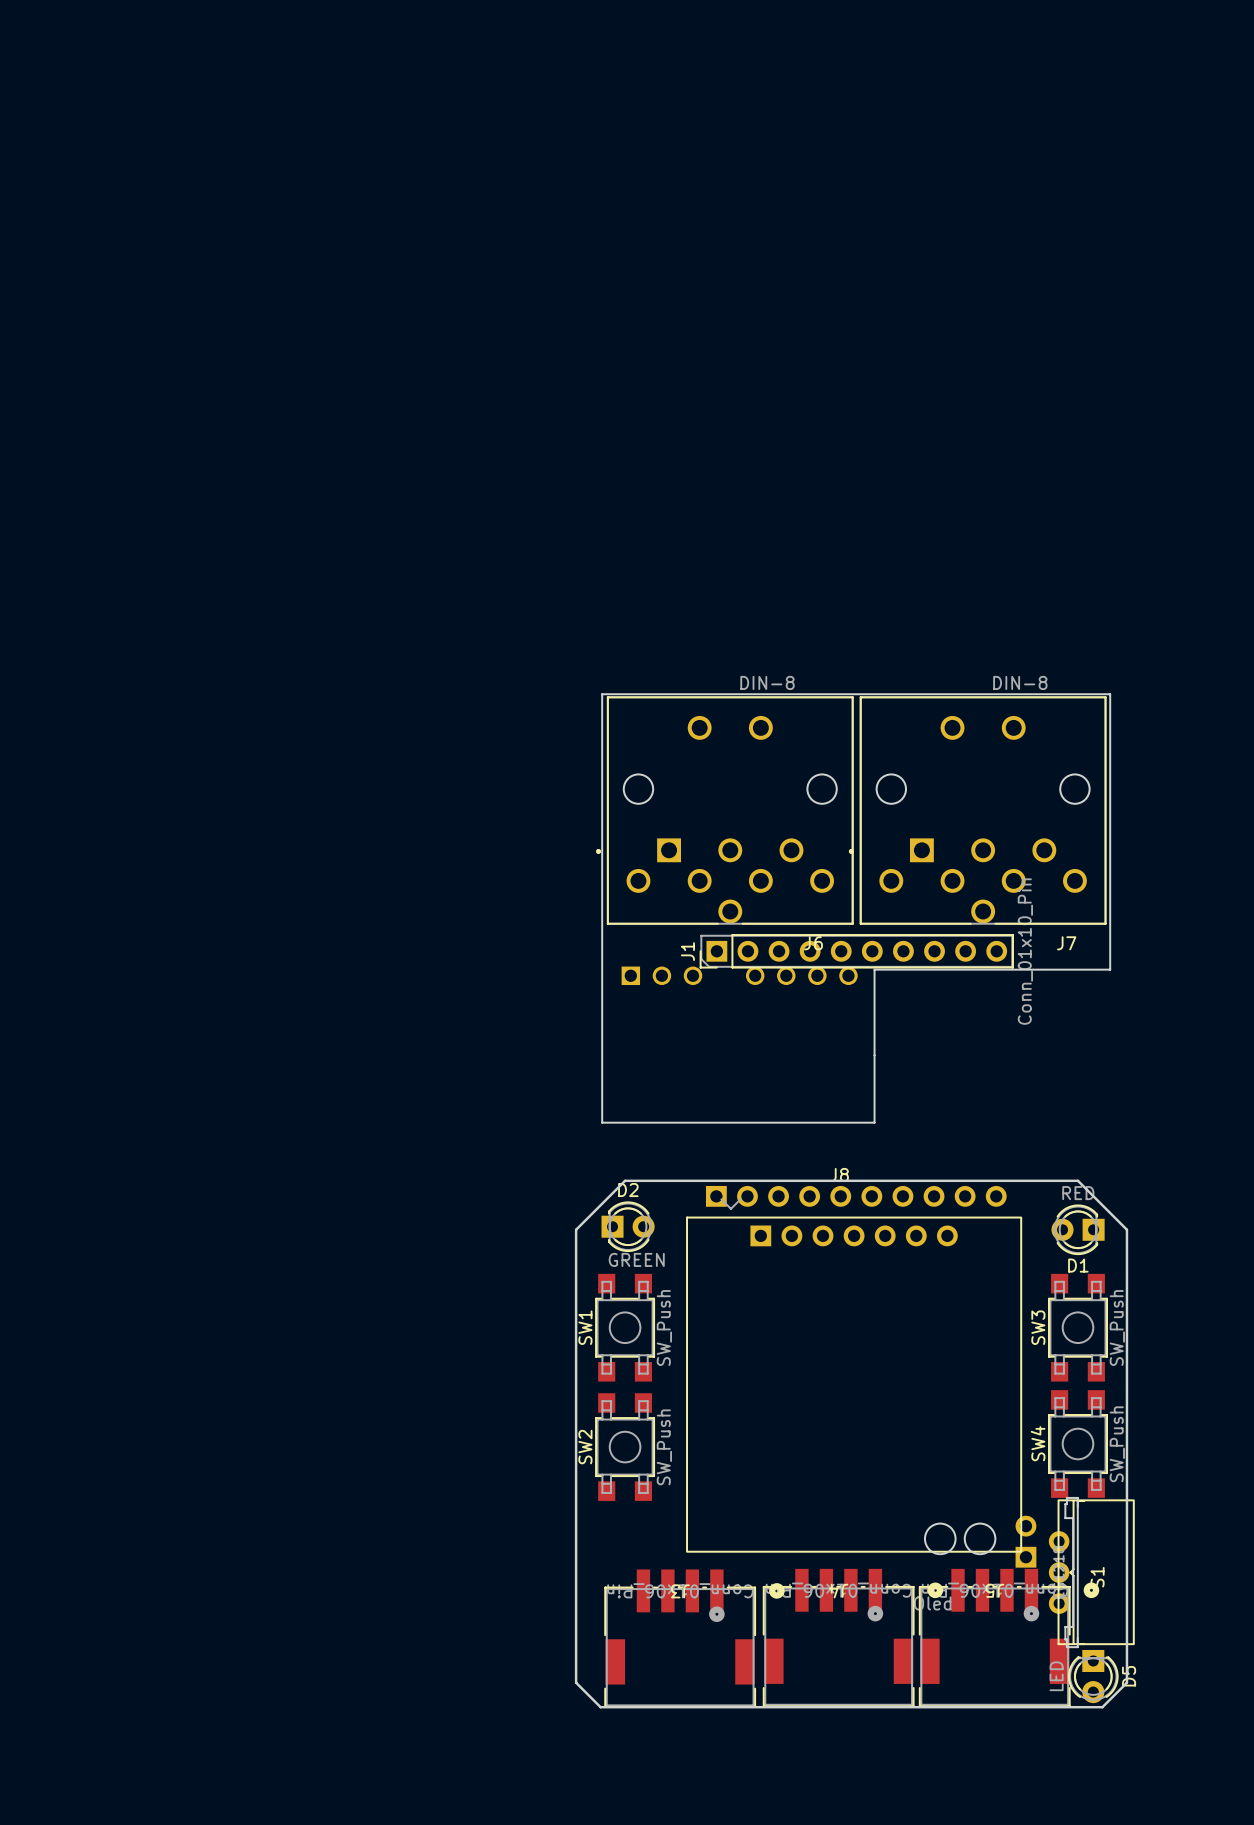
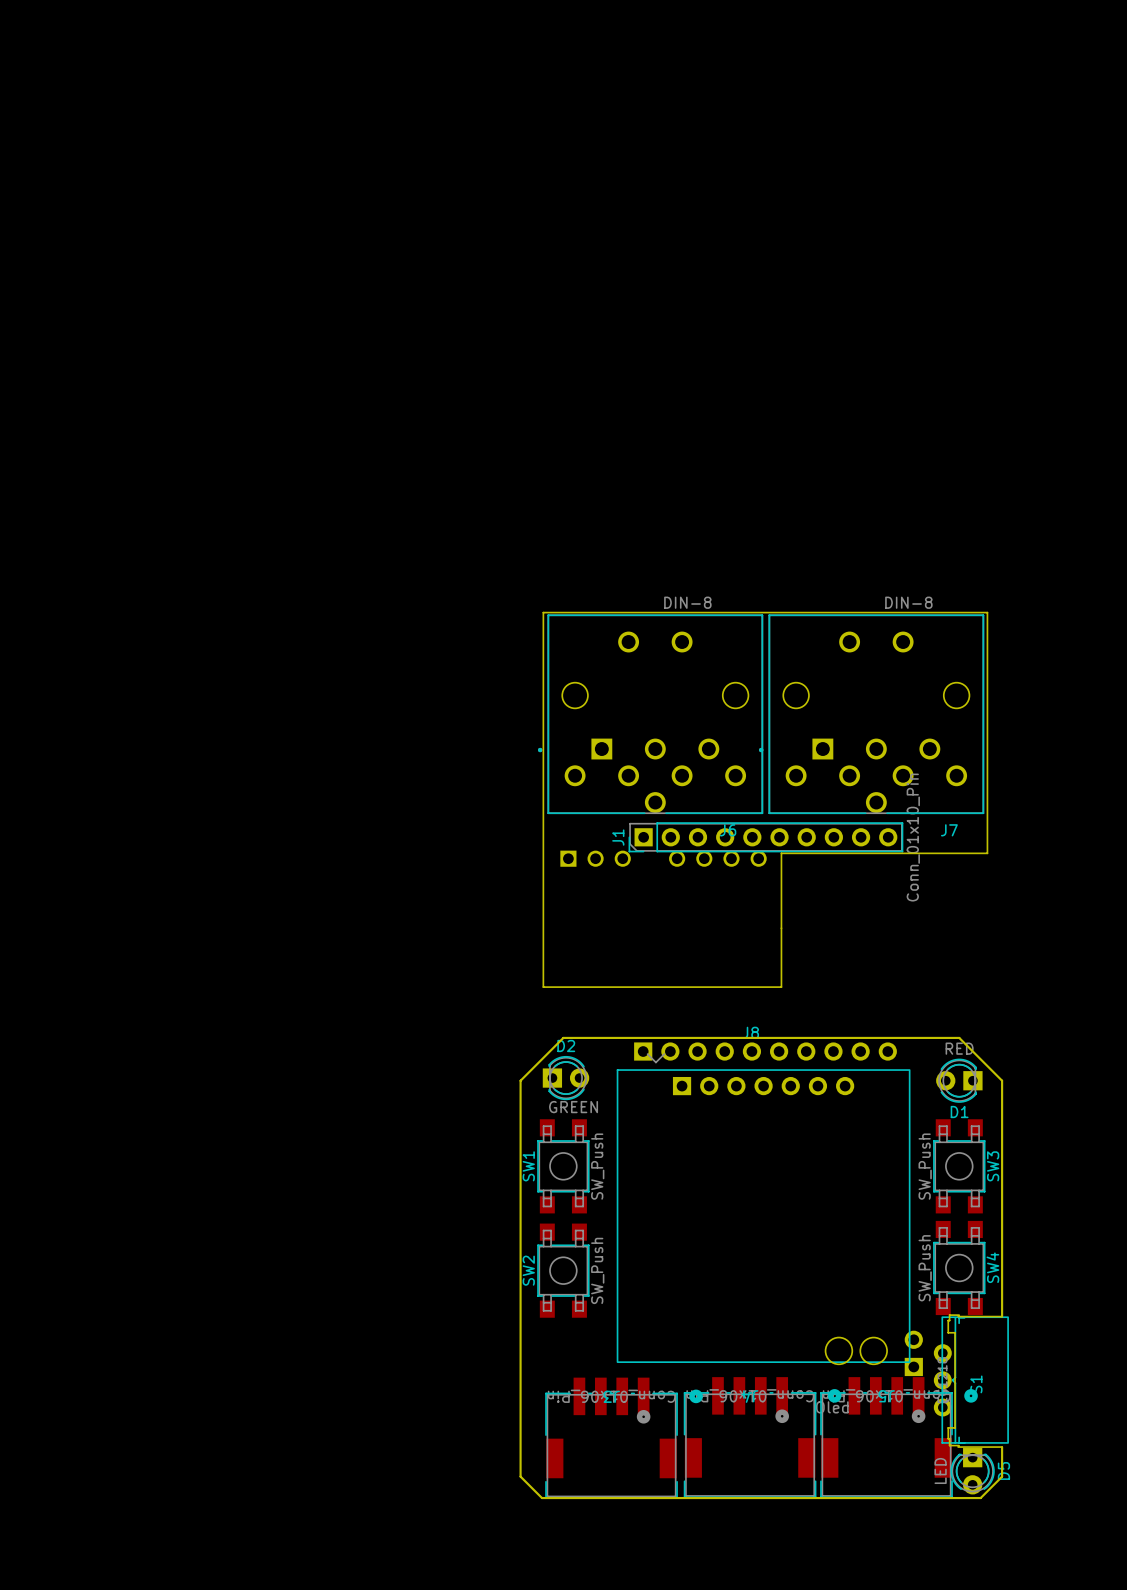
SW3 name position: SW3 (1038, 1327) -> SW3 (993, 1166)
SW3 value position: SW_Push (1117, 1328) -> SW_Push (925, 1166)
SW4 name position: SW4 (1038, 1443) -> SW4 (992, 1267)
SW4 value position: SW_Push (1117, 1444) -> SW_Push (925, 1268)
board edge: (1077, 1497) (1077, 1647) -> none
board edge: (1126, 1499) (1126, 1648) -> (1002, 1316) (958, 1316)
board edge: none -> (958, 1447) (1002, 1447)

